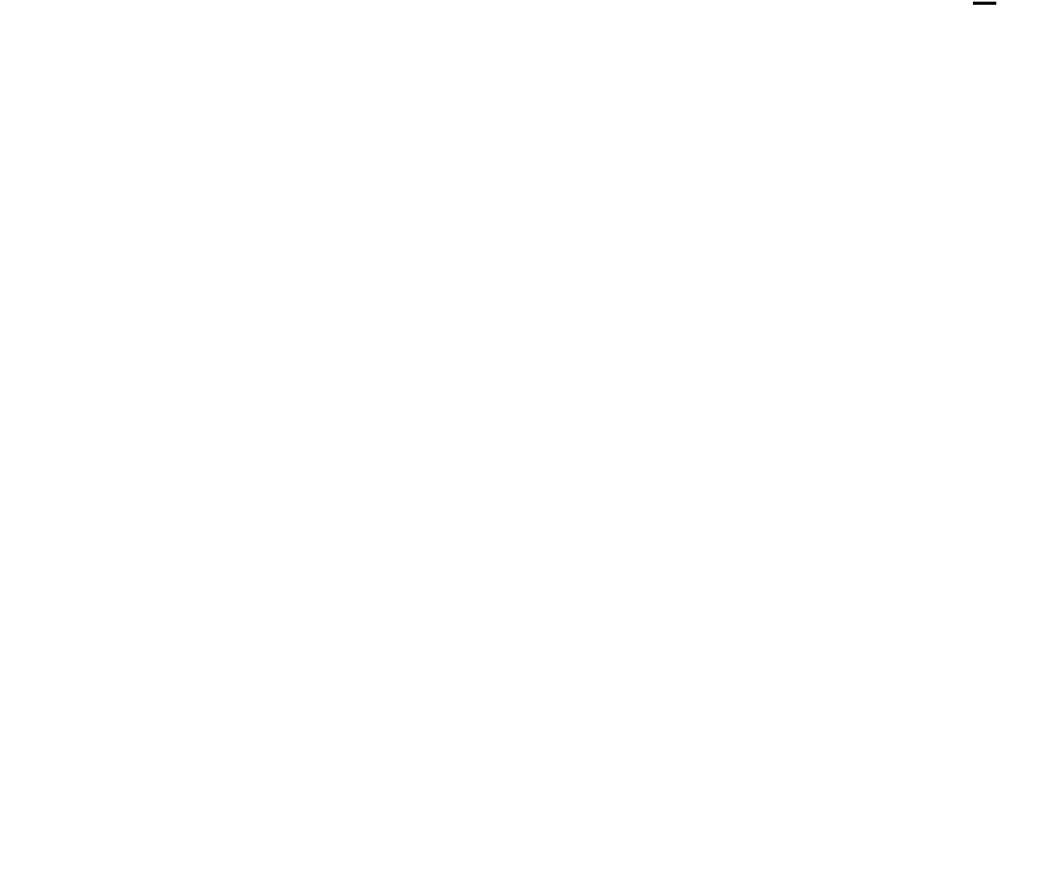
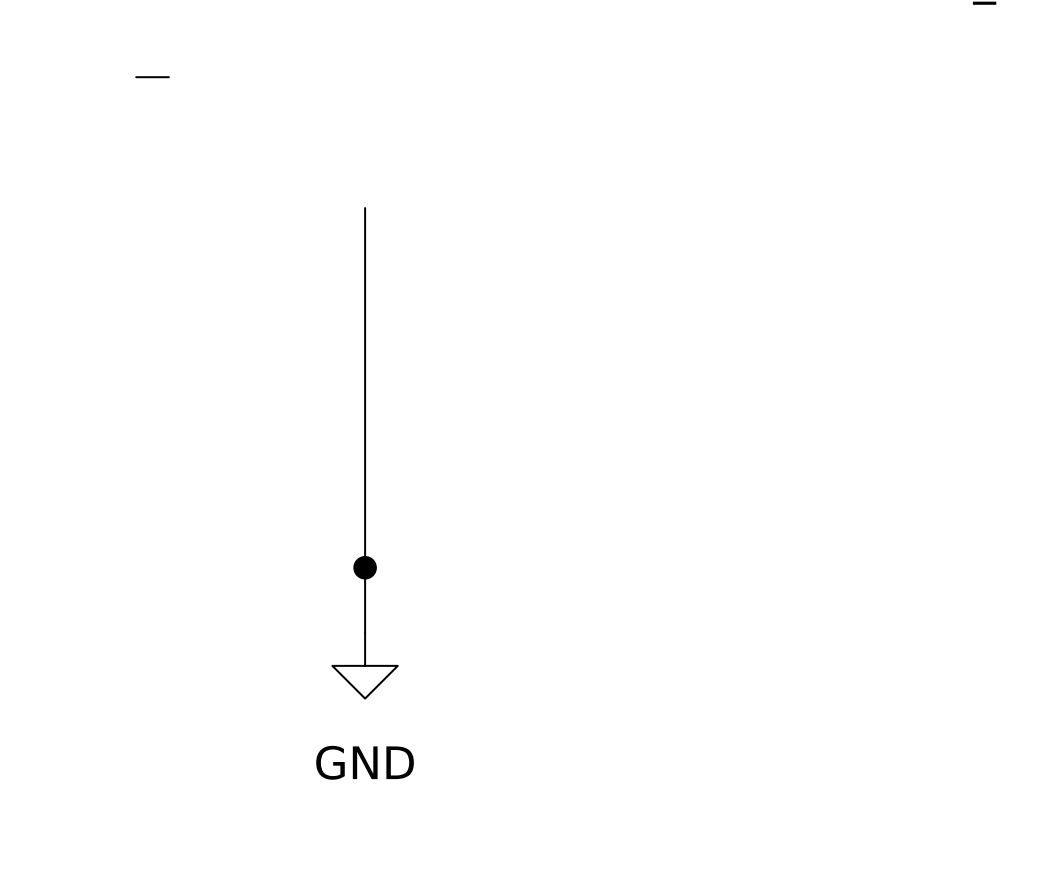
wire: none -> (136, 77) (168, 77)
wire: none -> (365, 208) (365, 633)
junction: none -> (365, 567)
power symbol: none -> GND (365, 665)

